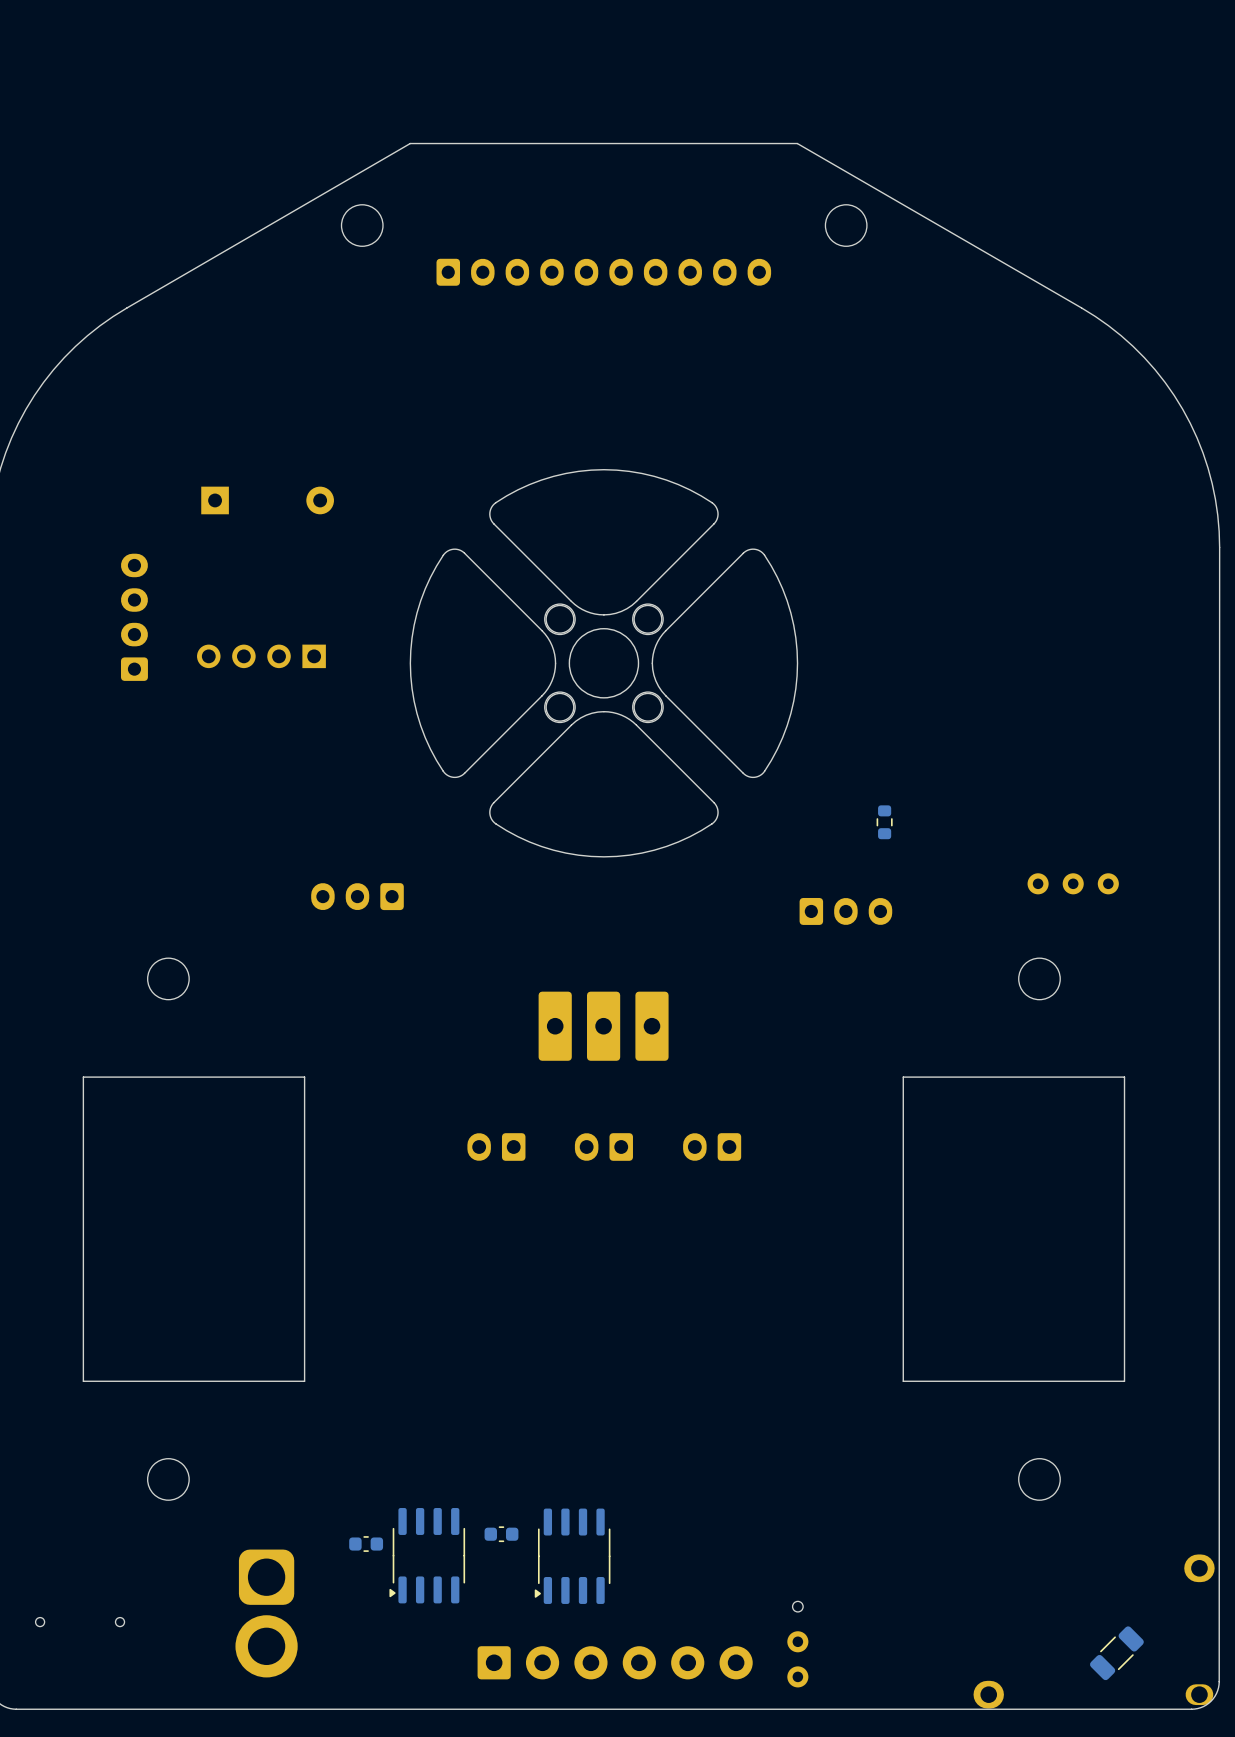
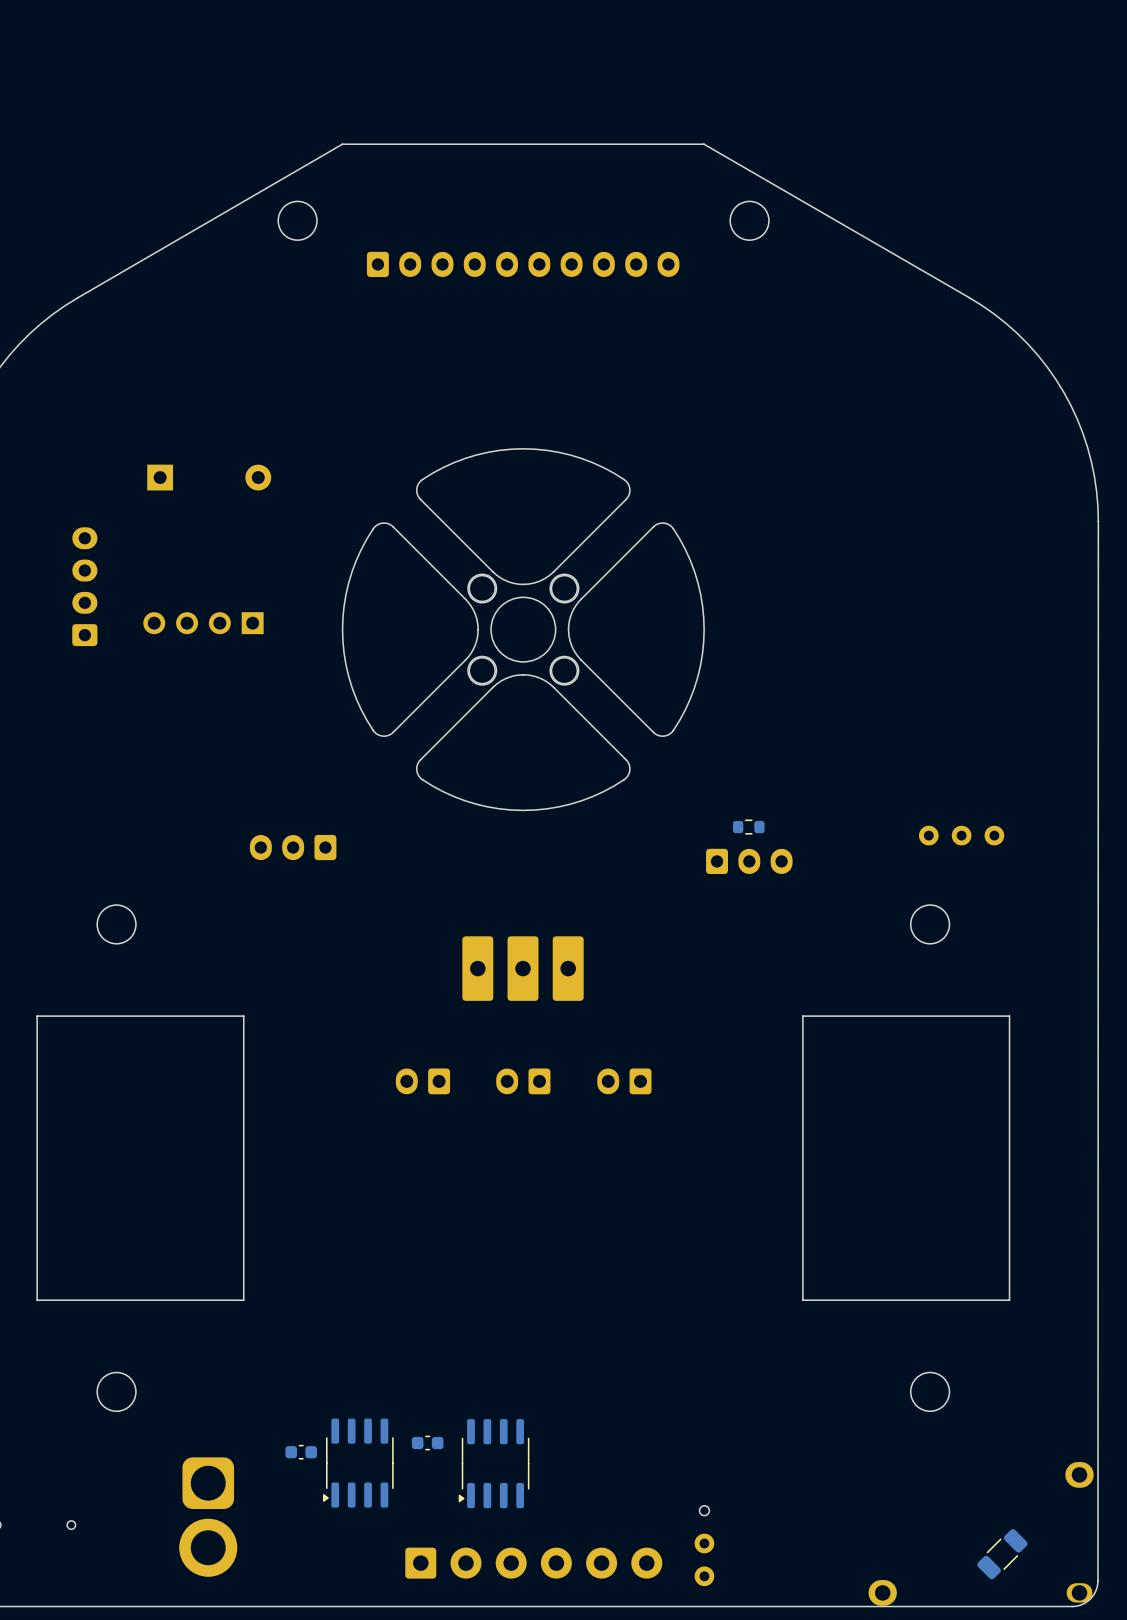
part rotation: 0° (884, 822) -> 90° clockwise (748, 827)
part position: (884, 822) -> (748, 827)

